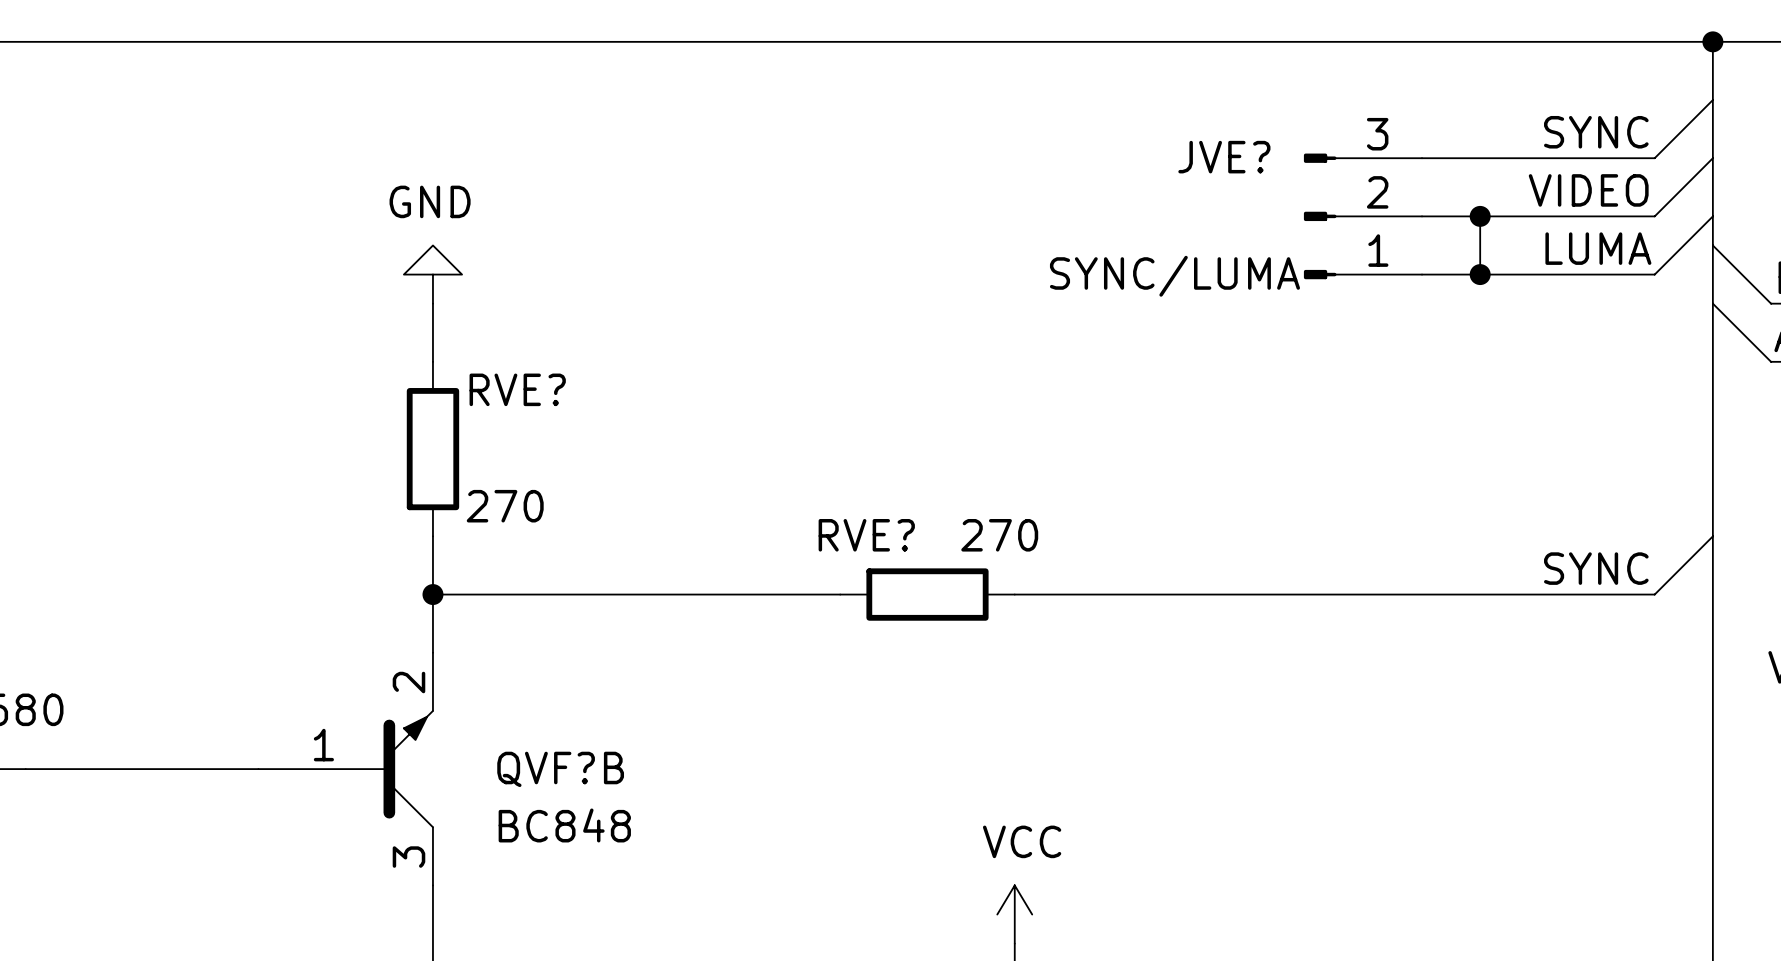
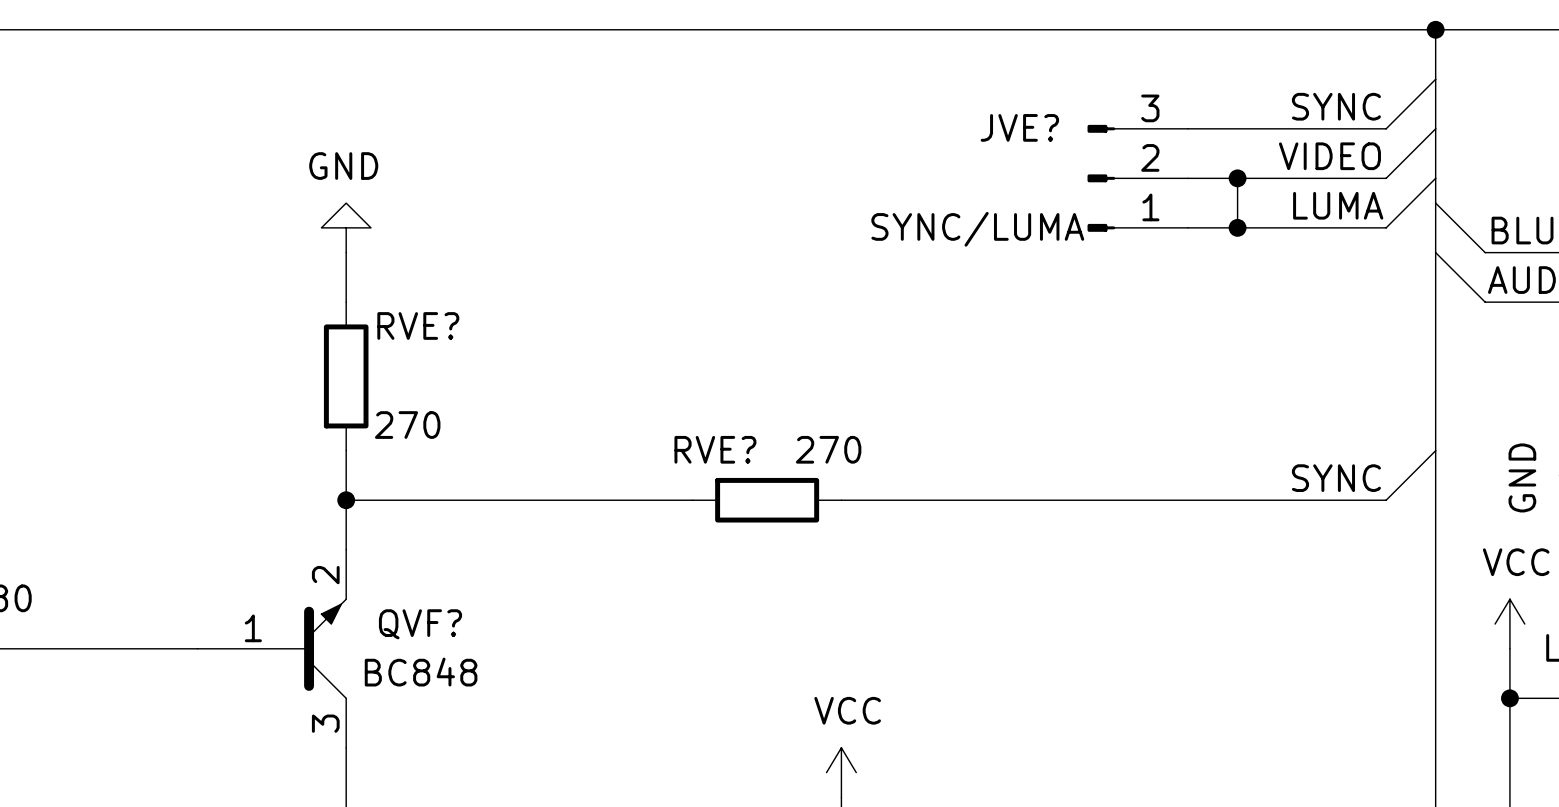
QVF?B name: QVF?B (560, 769) -> QVF? (420, 624)
QVF?B value position: BC848 (564, 825) -> BC848 (421, 672)

